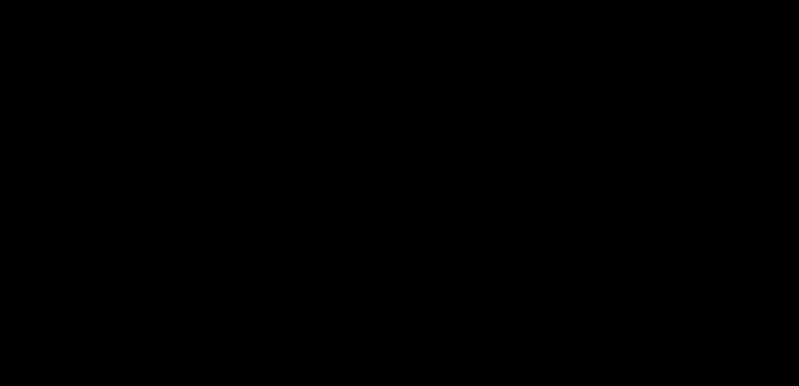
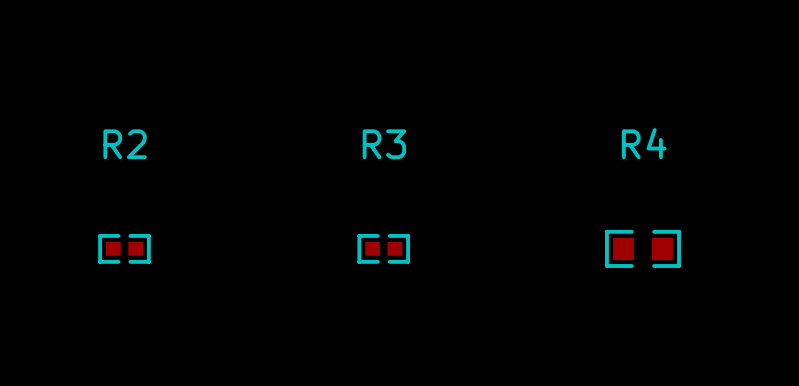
R2: none -> (124, 248)
R3: none -> (383, 248)
R4: none -> (642, 248)

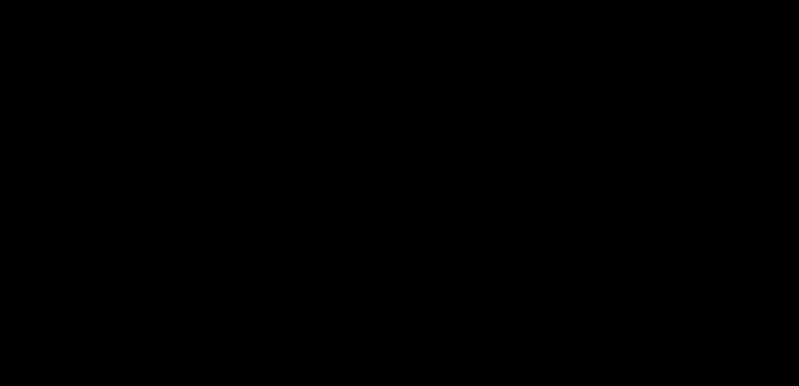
R2: (124, 248) -> none
R3: (383, 248) -> none
R4: (642, 248) -> none

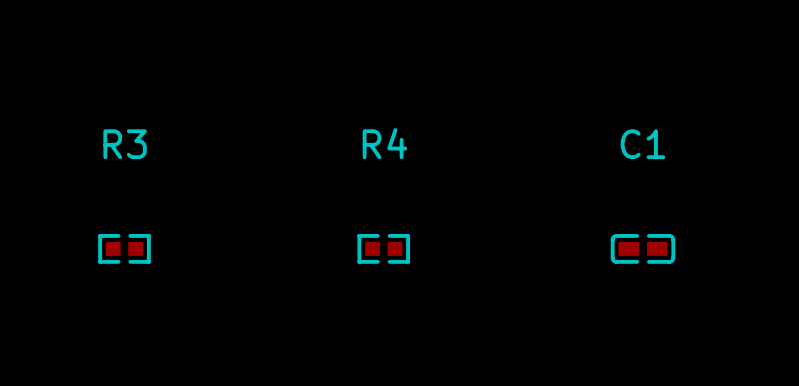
R3: none -> (124, 248)
R4: none -> (383, 248)
C1: none -> (642, 248)

